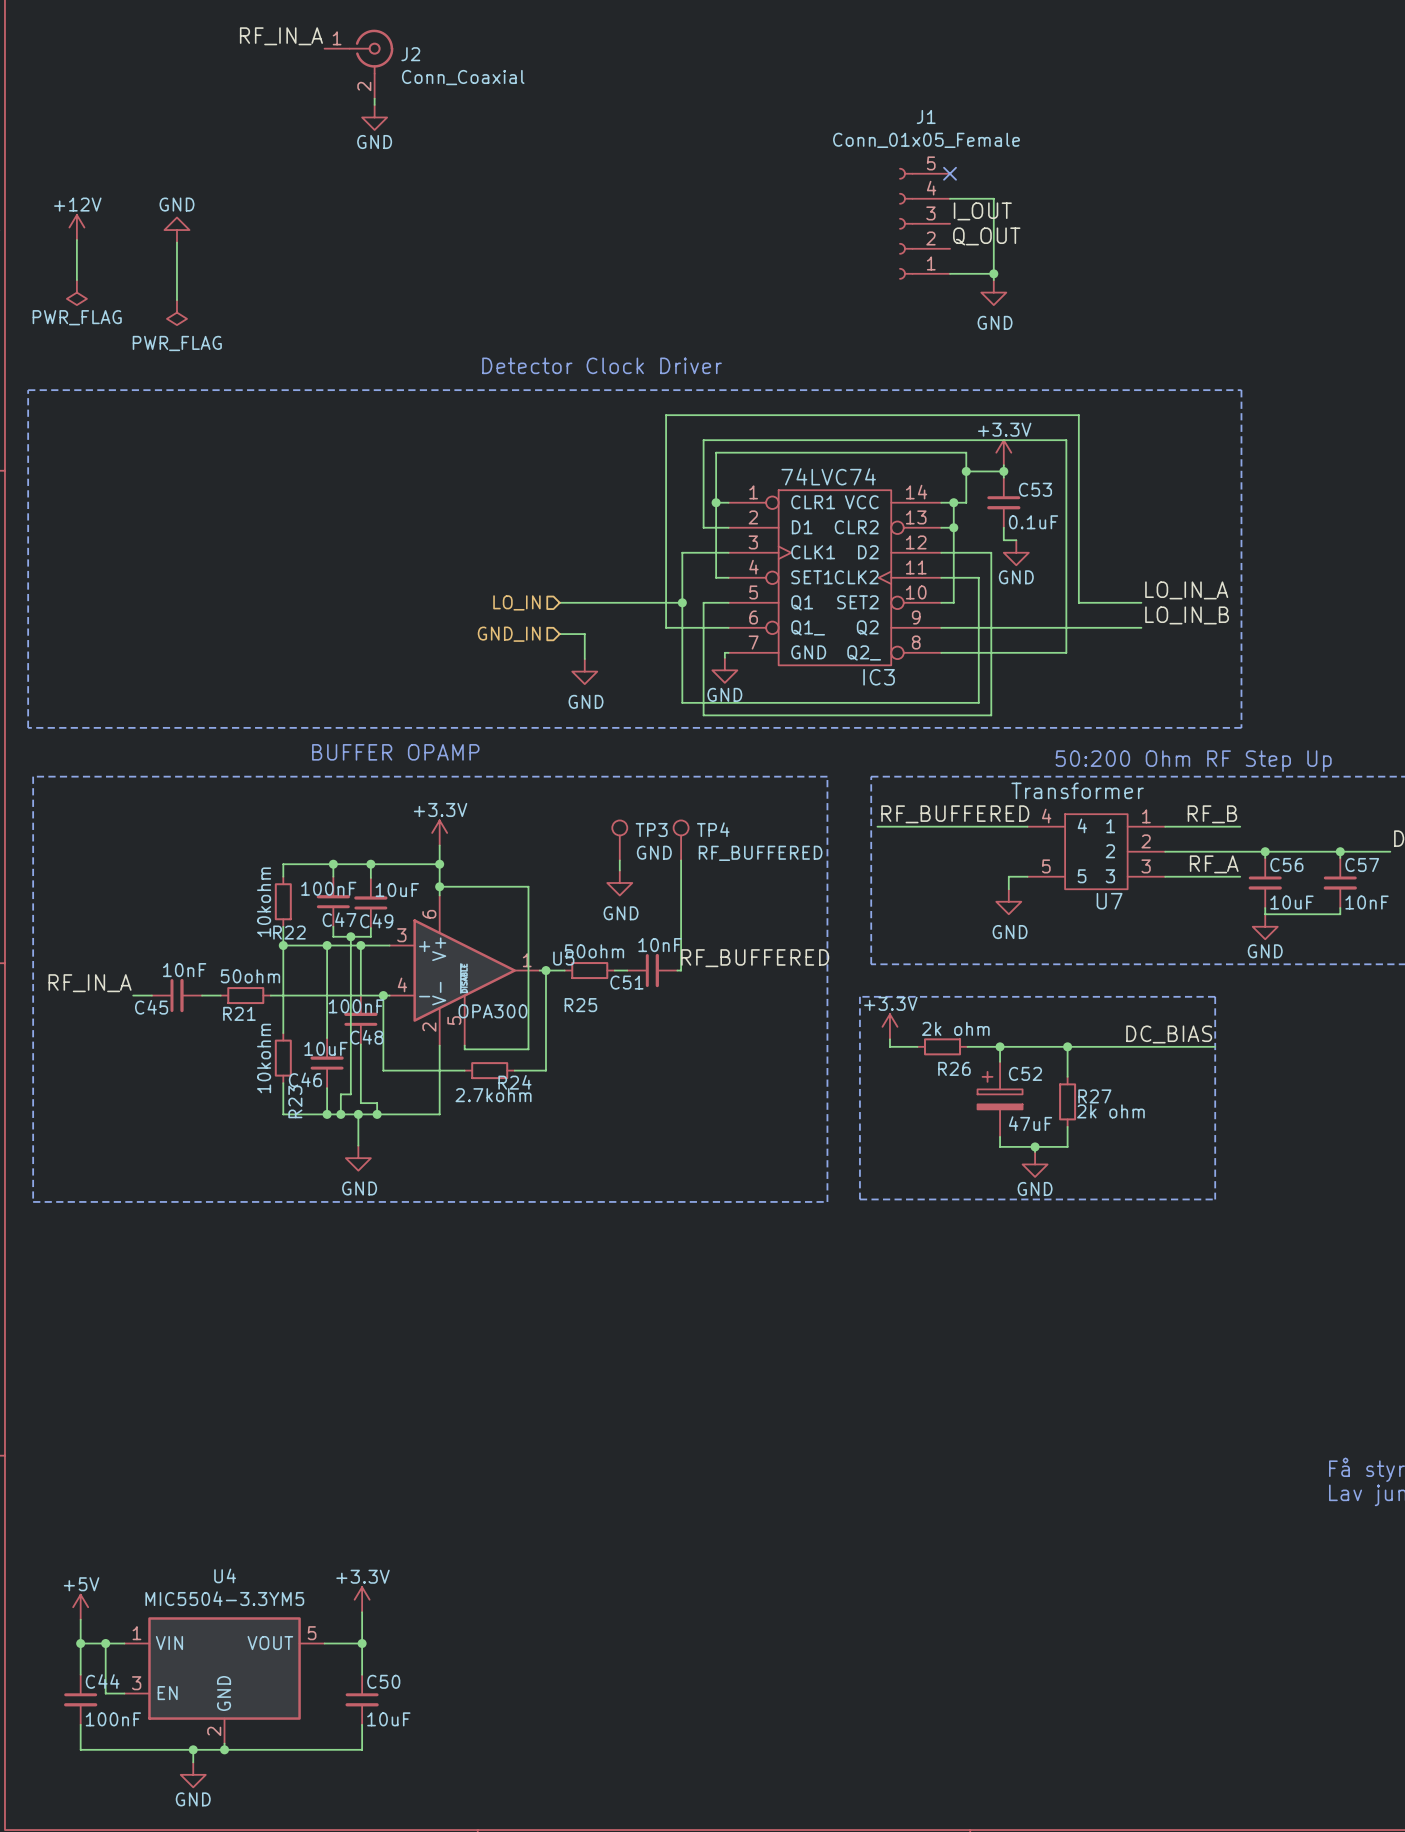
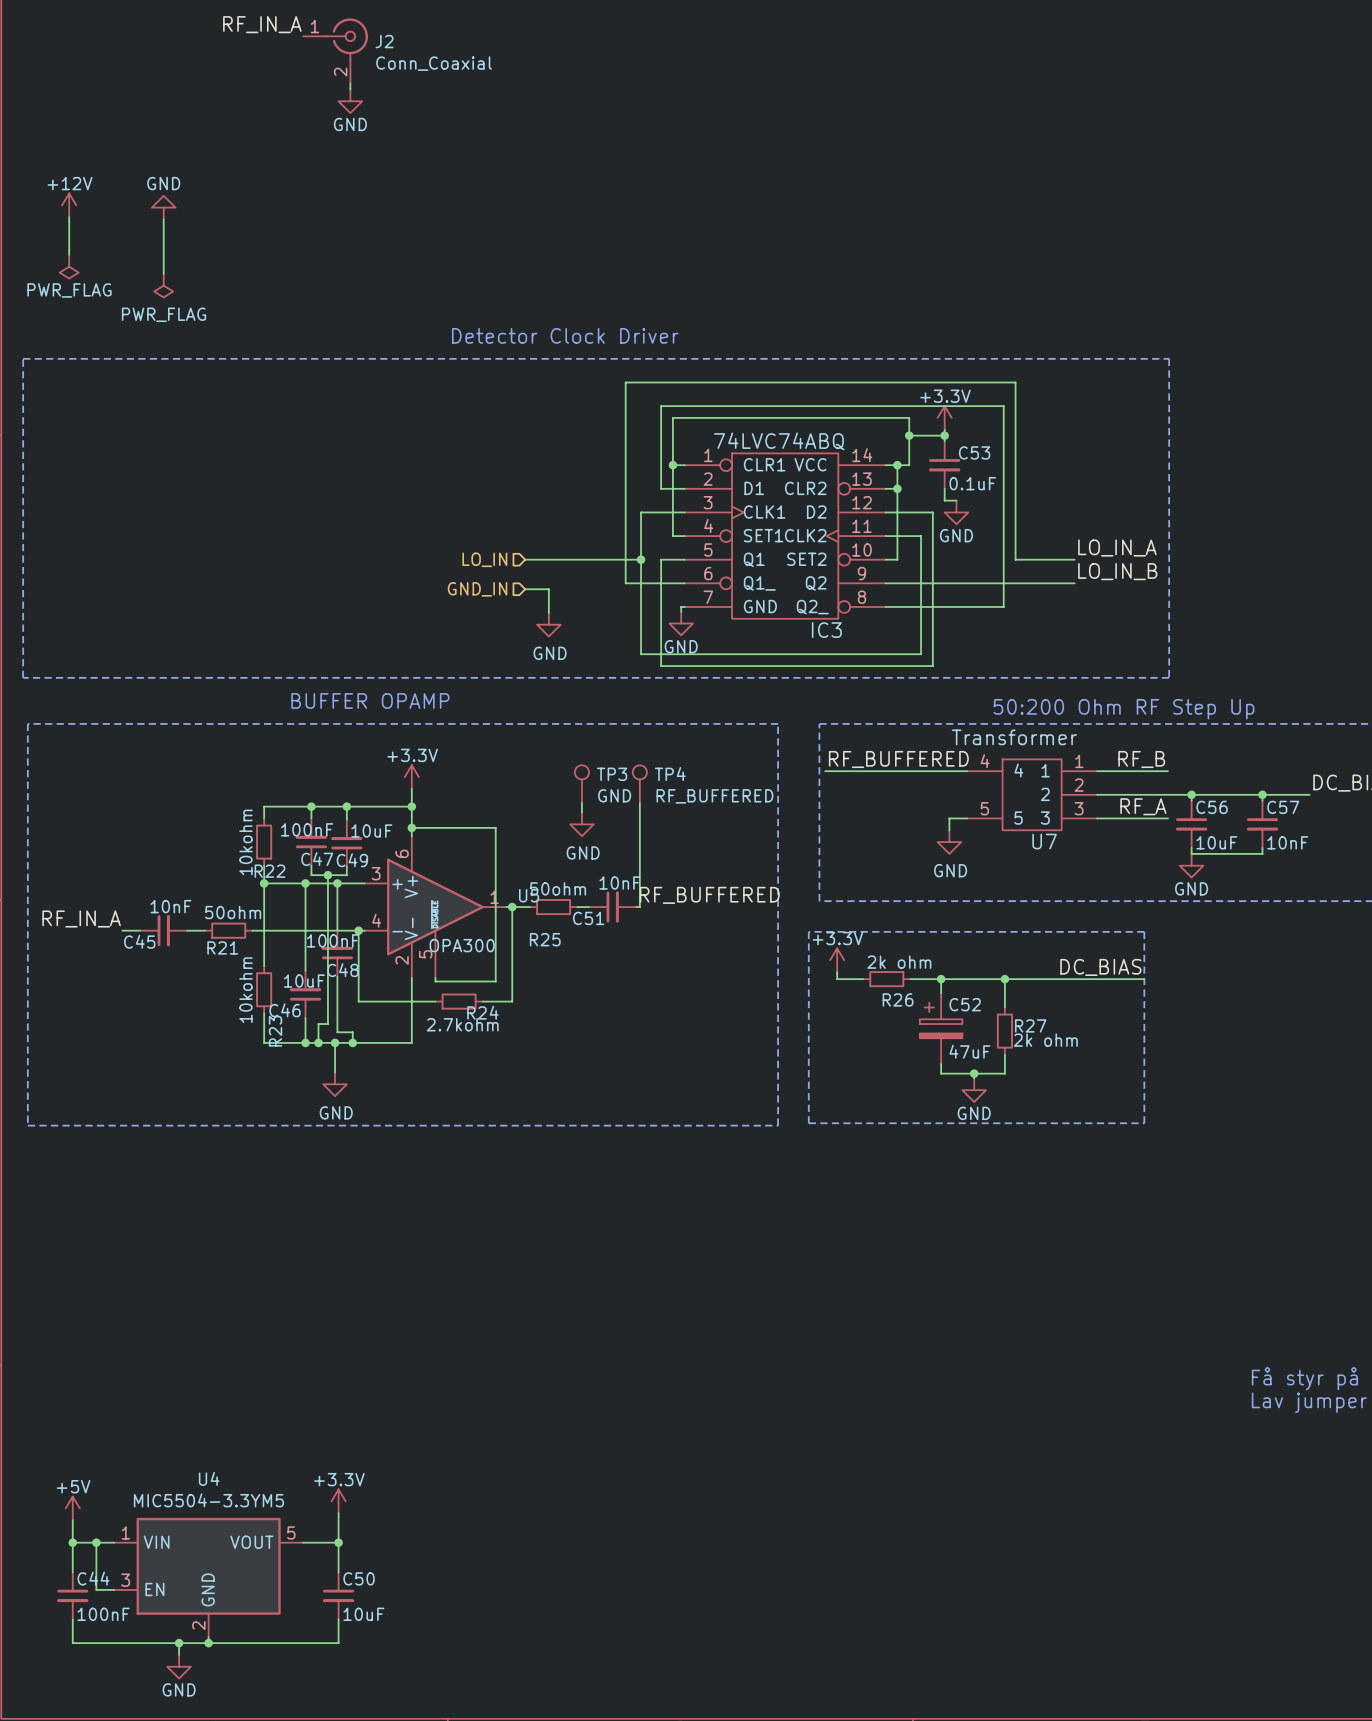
no-connect mark: (950, 173) -> none
wire: (950, 198) (993, 198) (993, 280) -> none
label: I_OUT (982, 211) -> none
J1: Conn_01x05_Female (924, 223) -> none
label: Q_OUT (986, 236) -> none
wire: (950, 273) (993, 273) -> none
junction: (993, 273) -> none
power symbol: GND (993, 292) -> none
IC3 value: 74LVC74 (828, 476) -> 74LVC74ABQ (779, 441)

